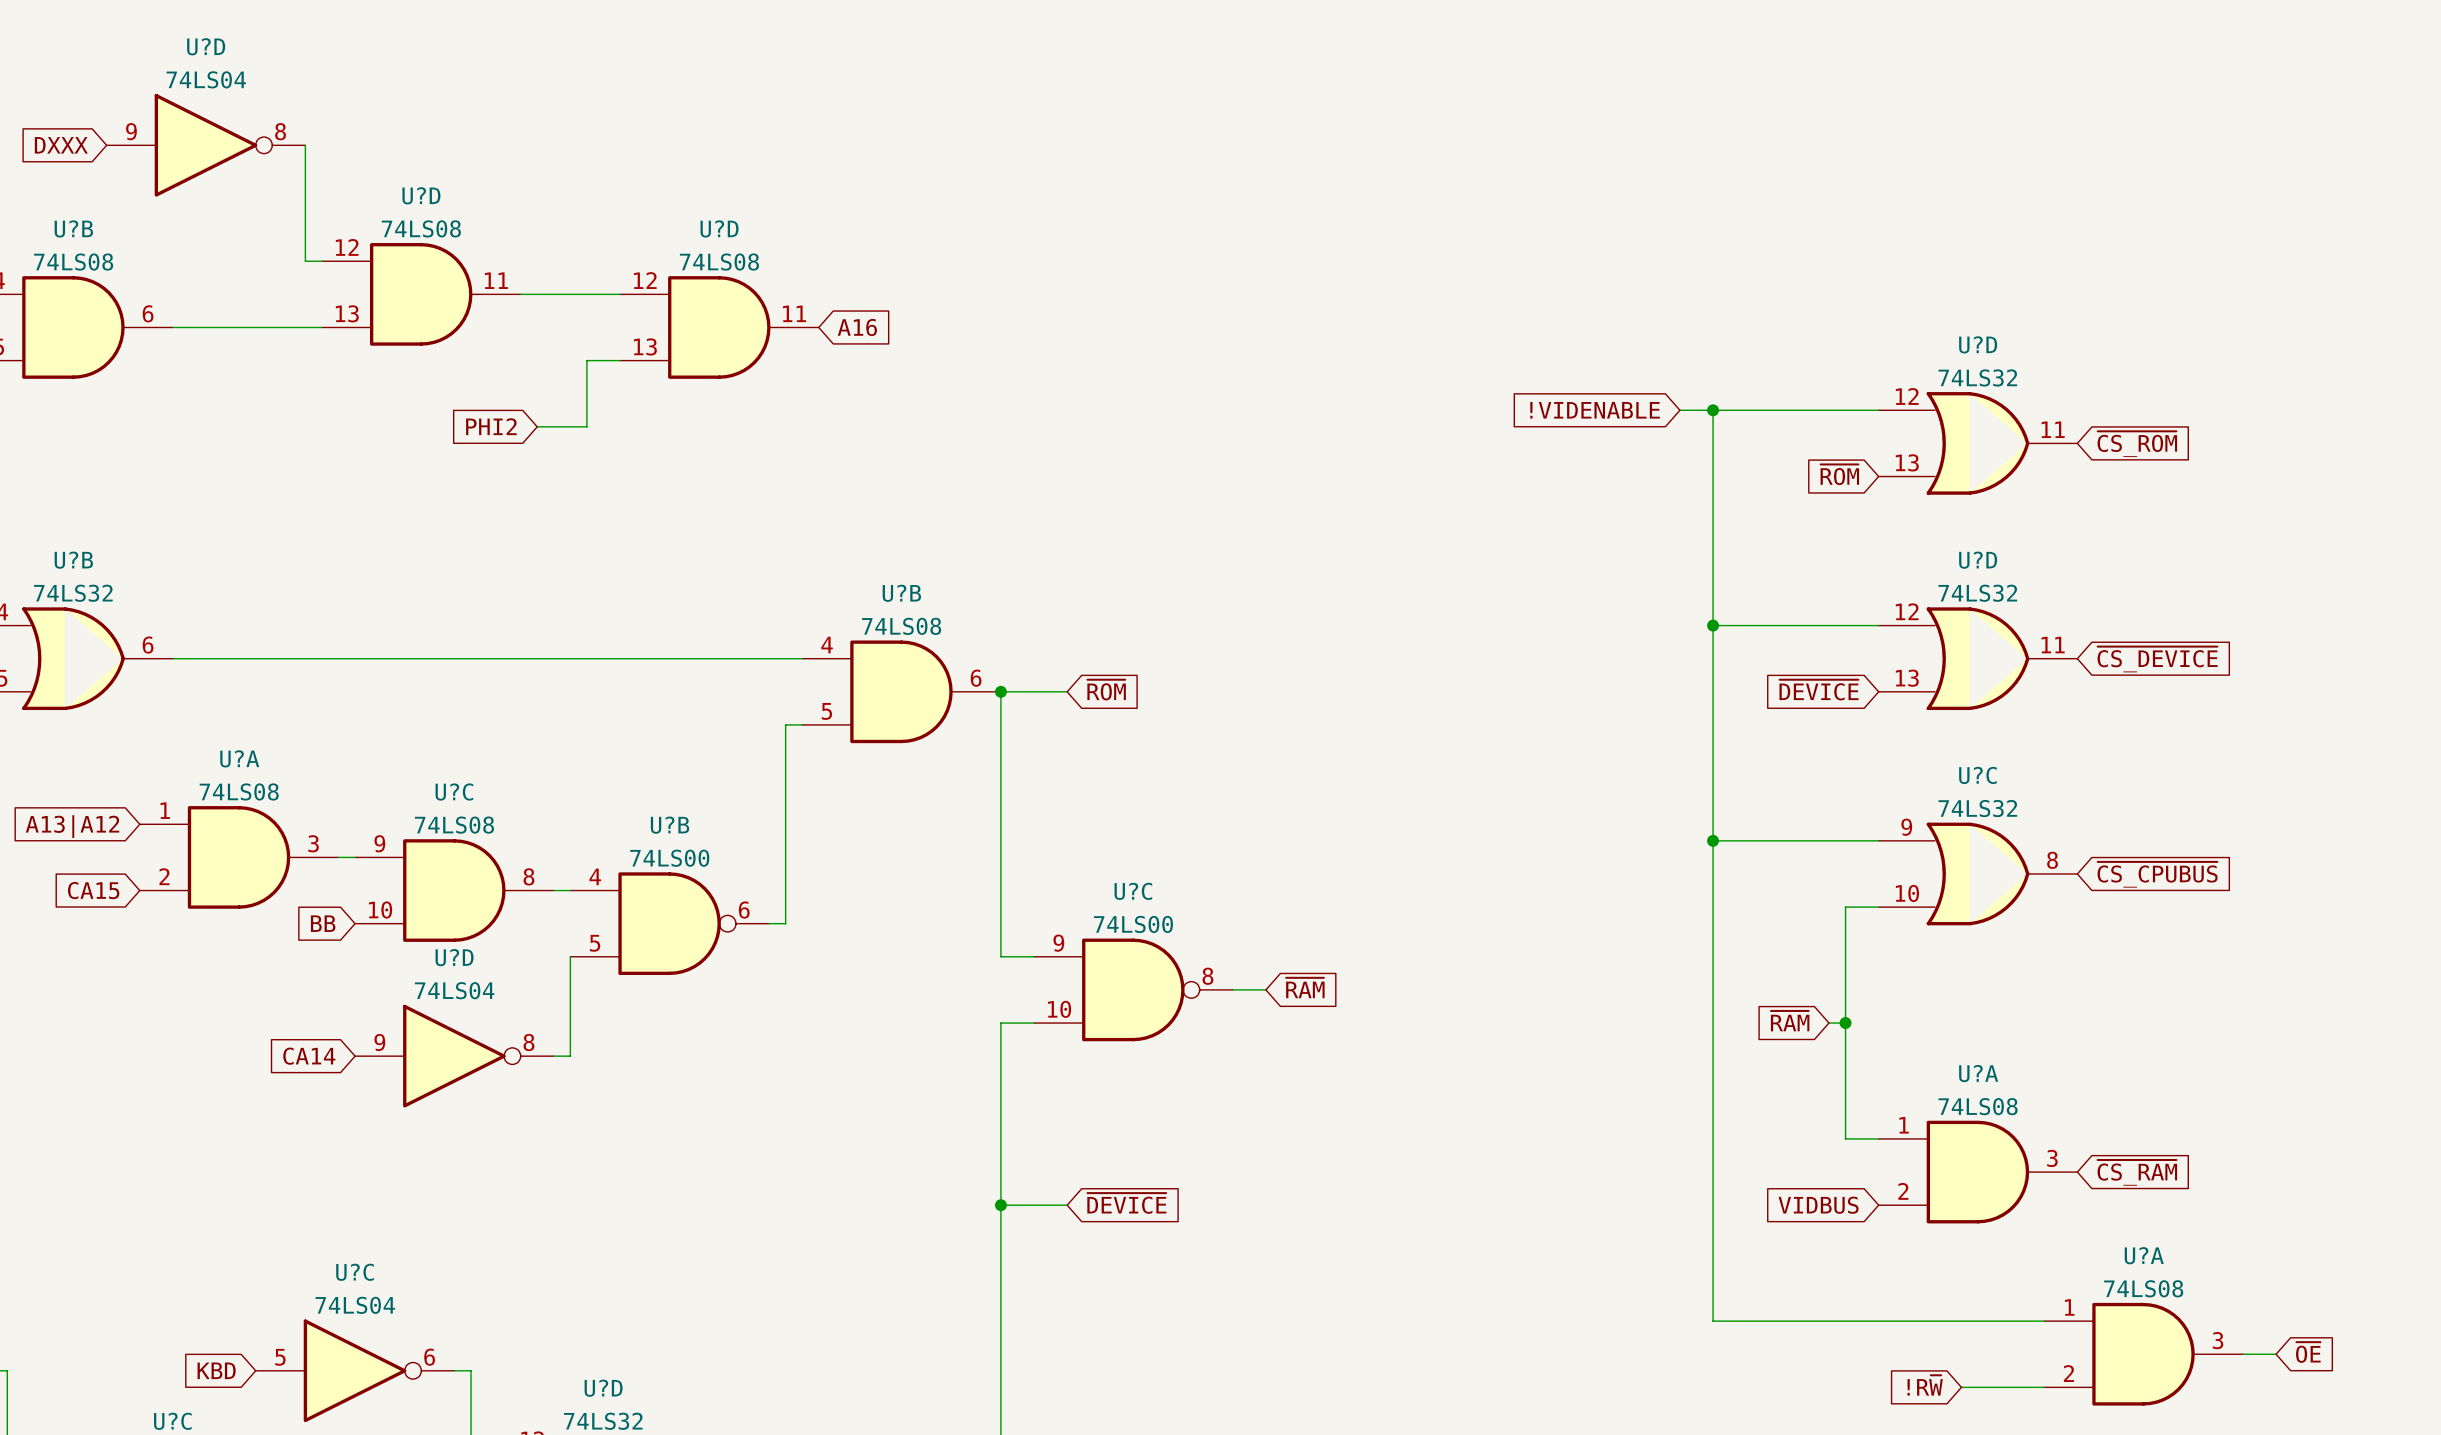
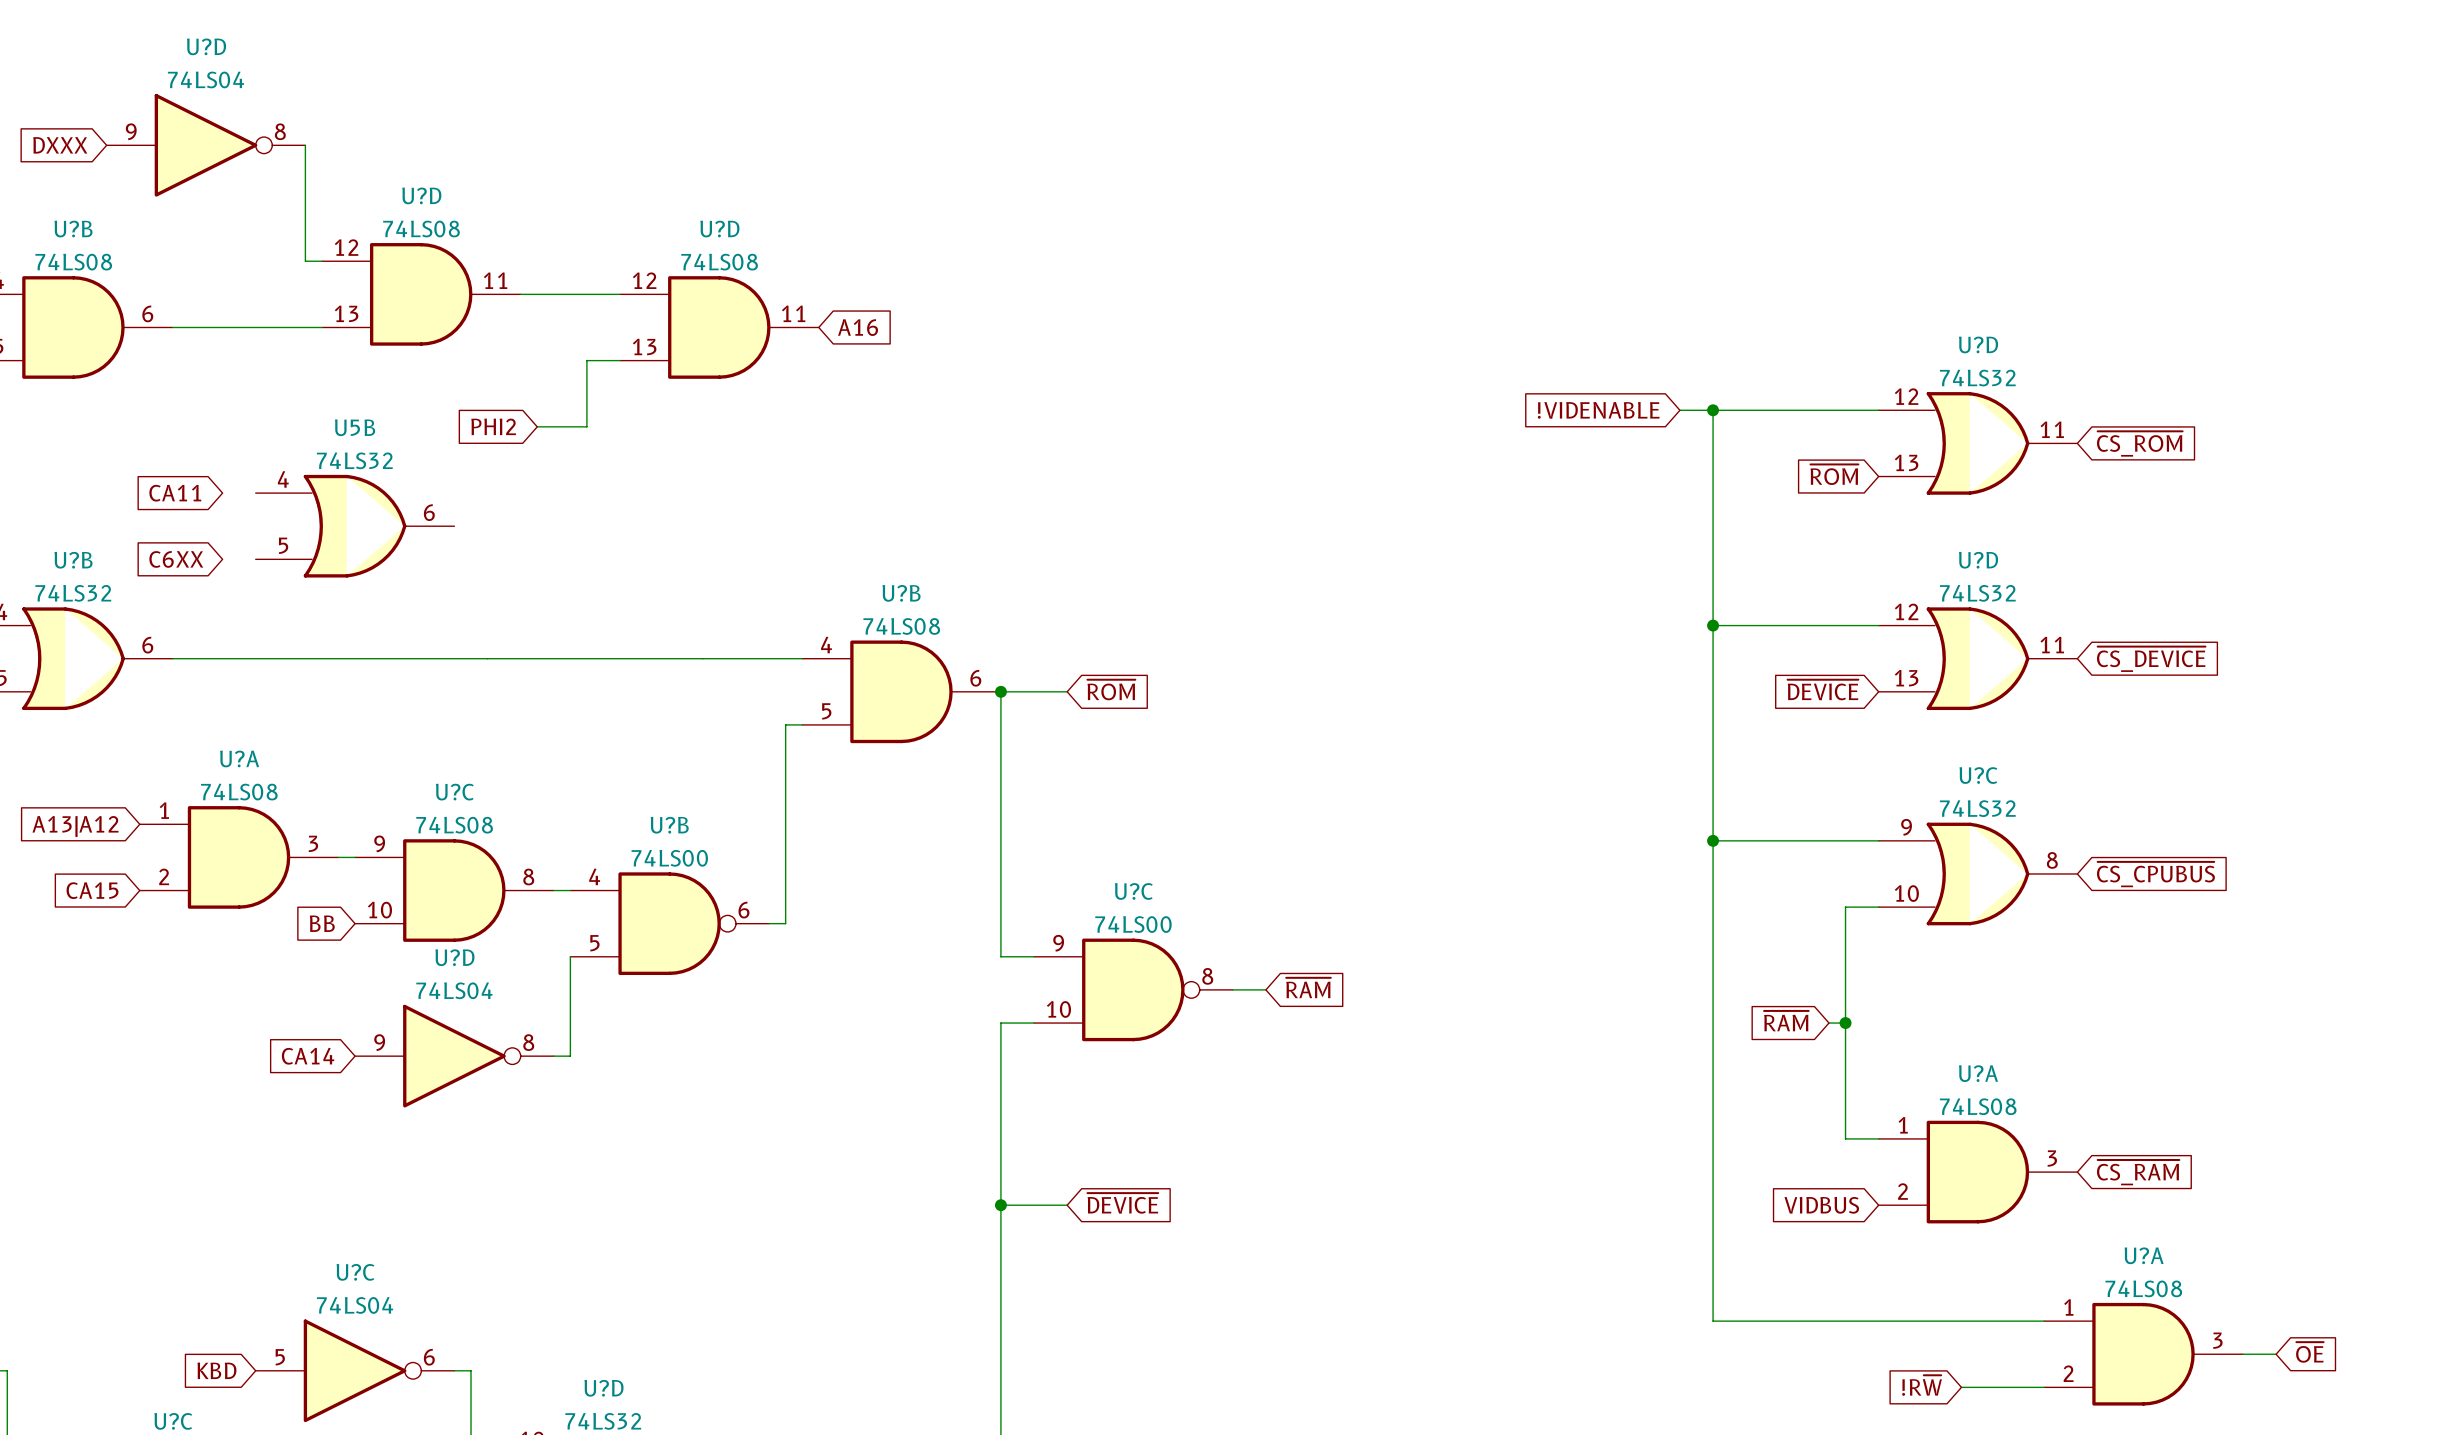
global label: none -> CA11 (175, 493)
U5B: none -> 74LS32 (355, 526)
global label: none -> C6XX (176, 559)

